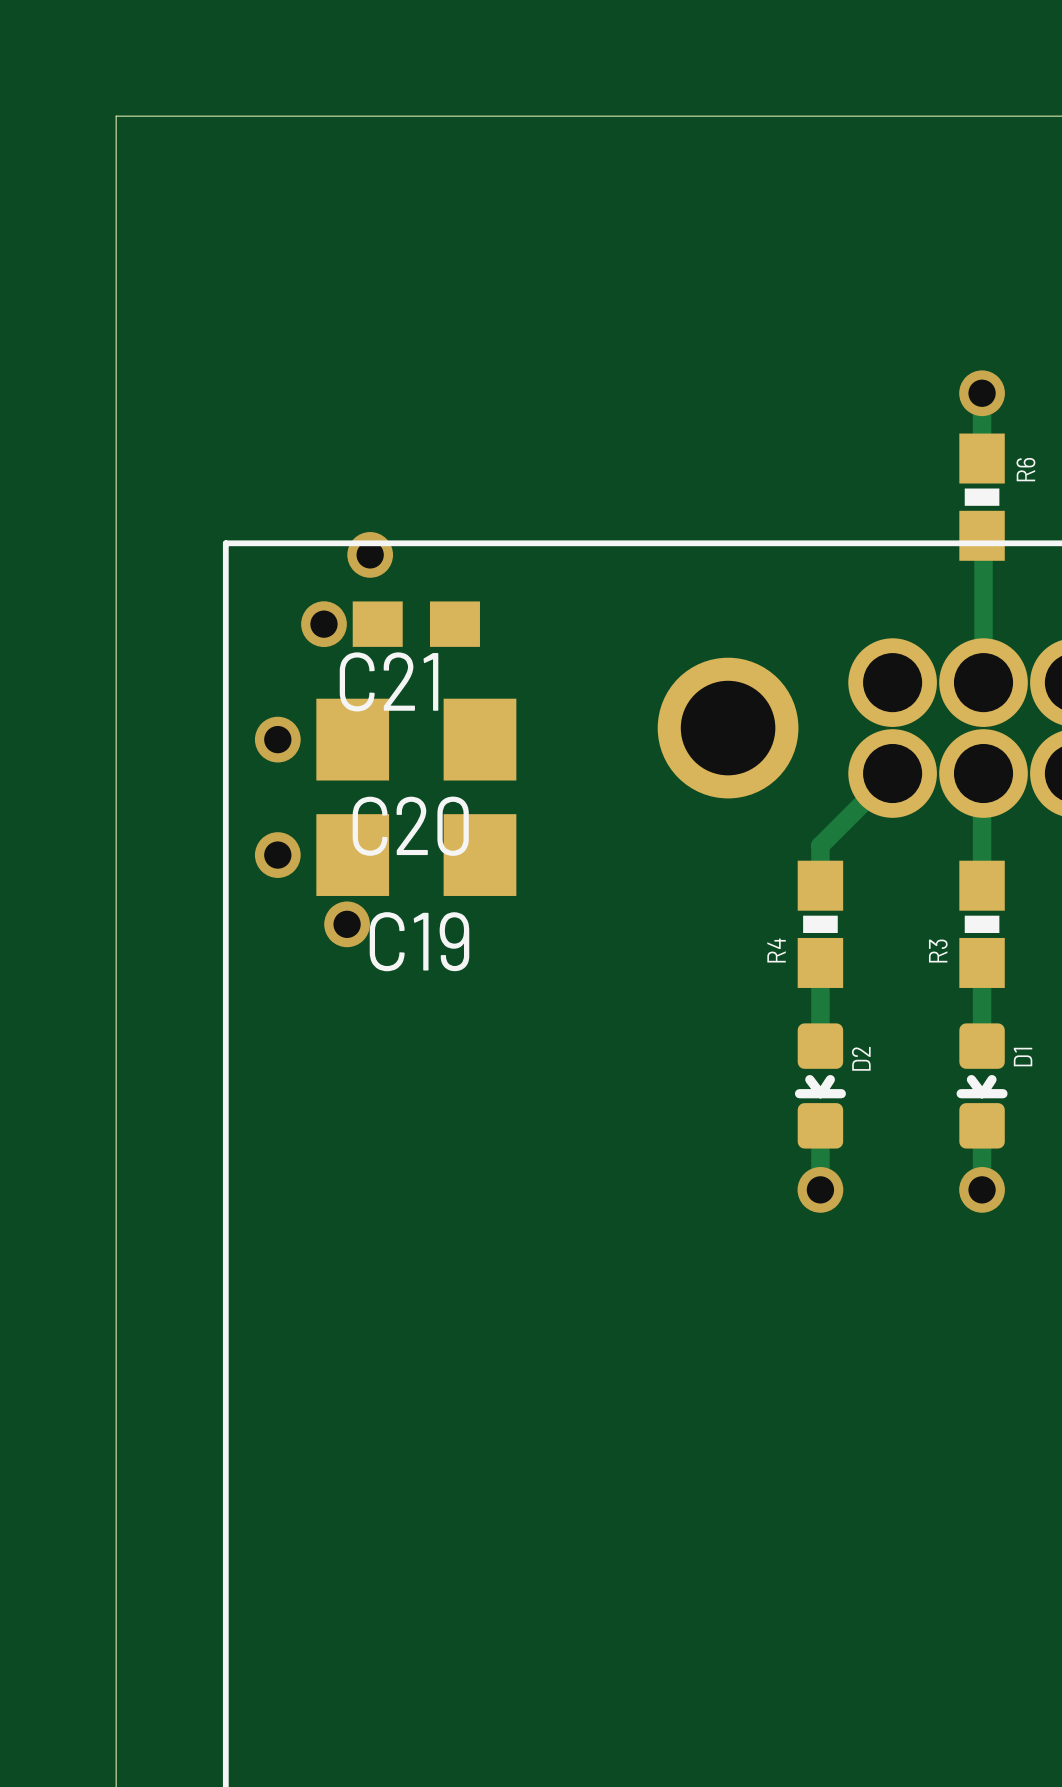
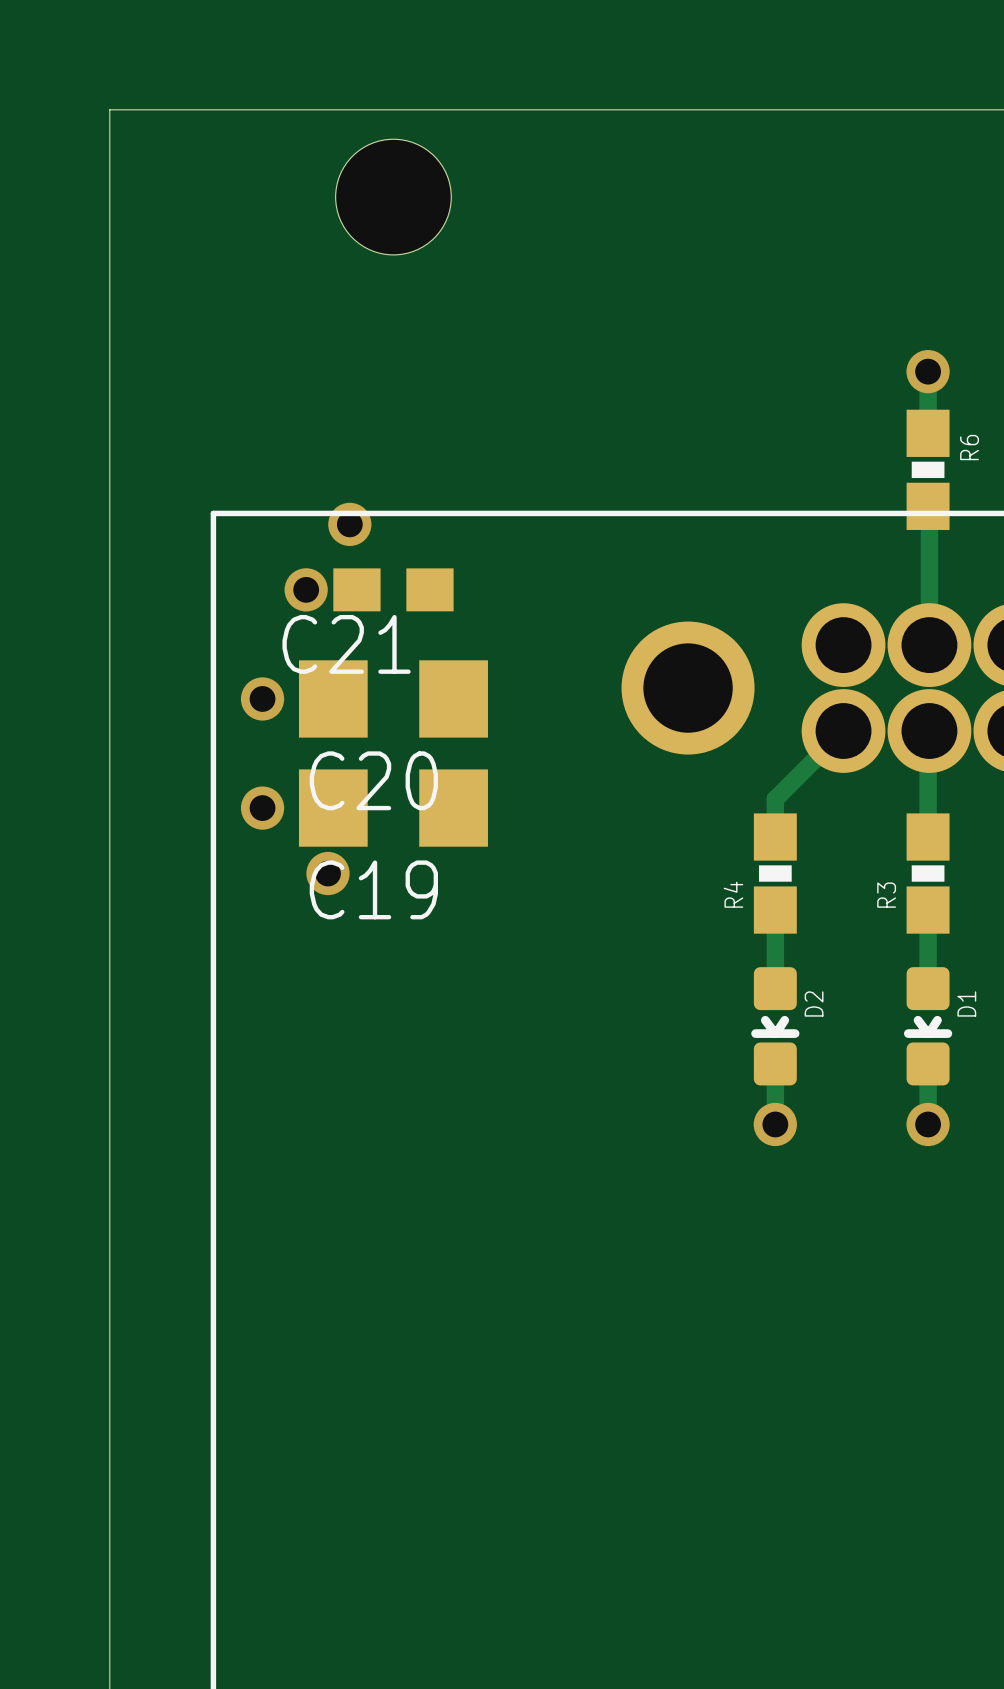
hole: none -> (393, 197)

